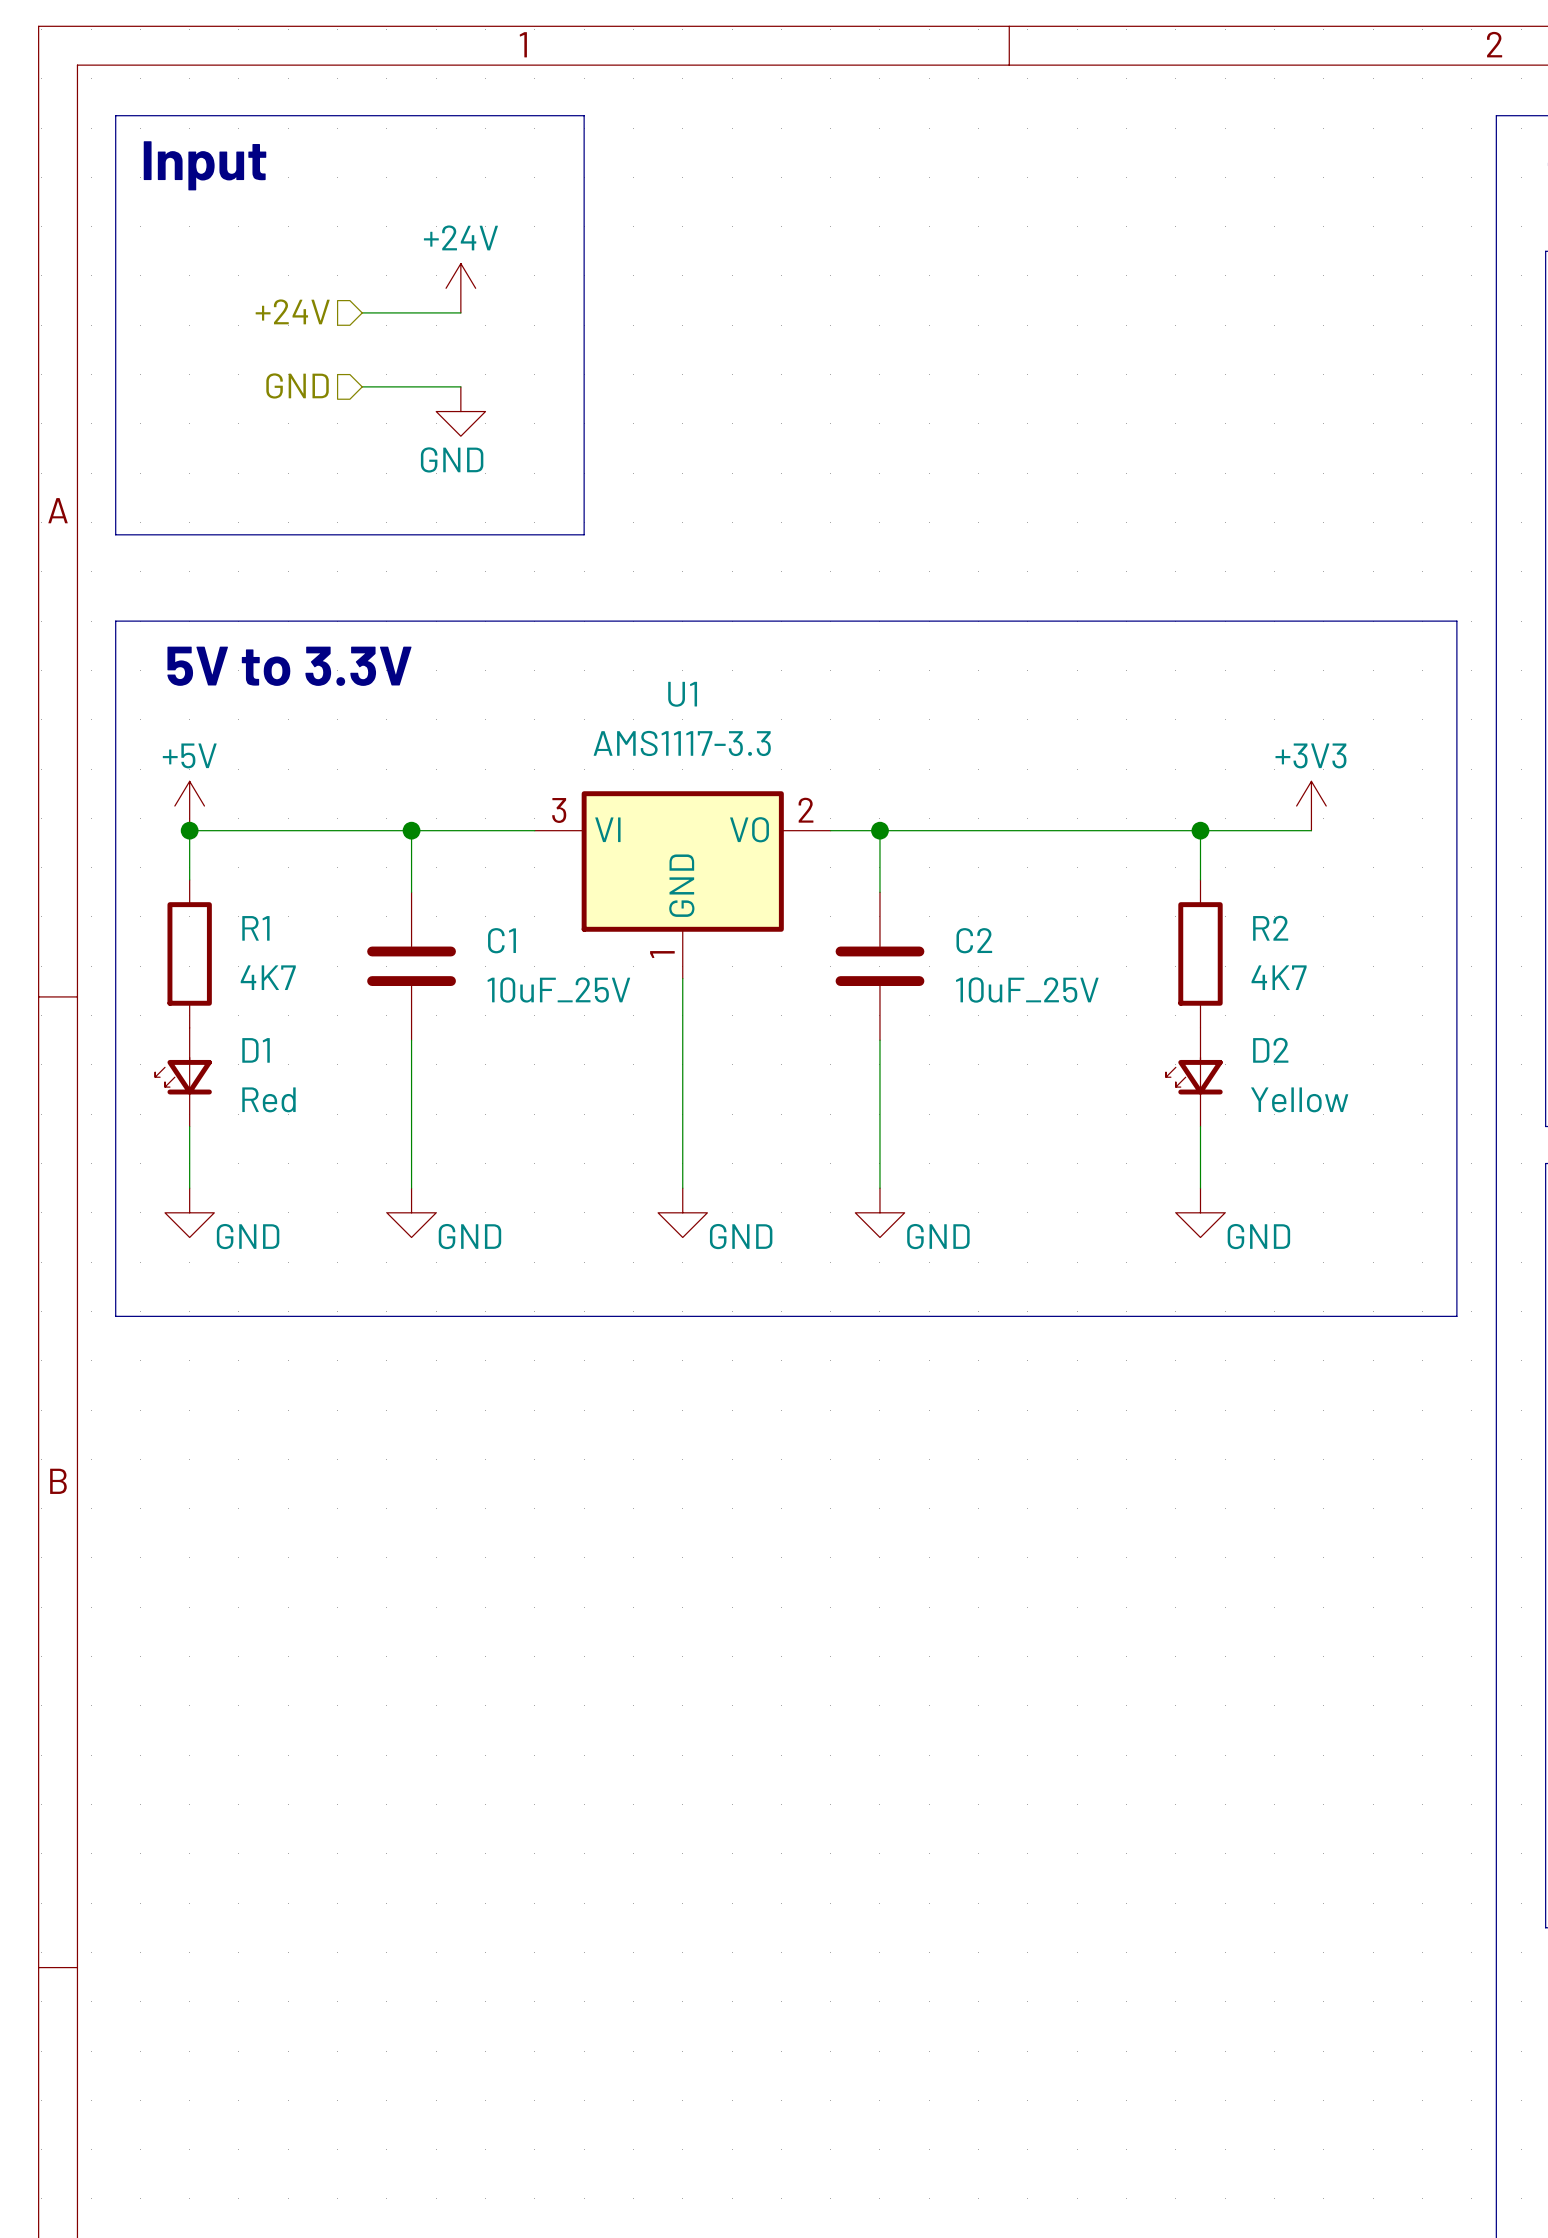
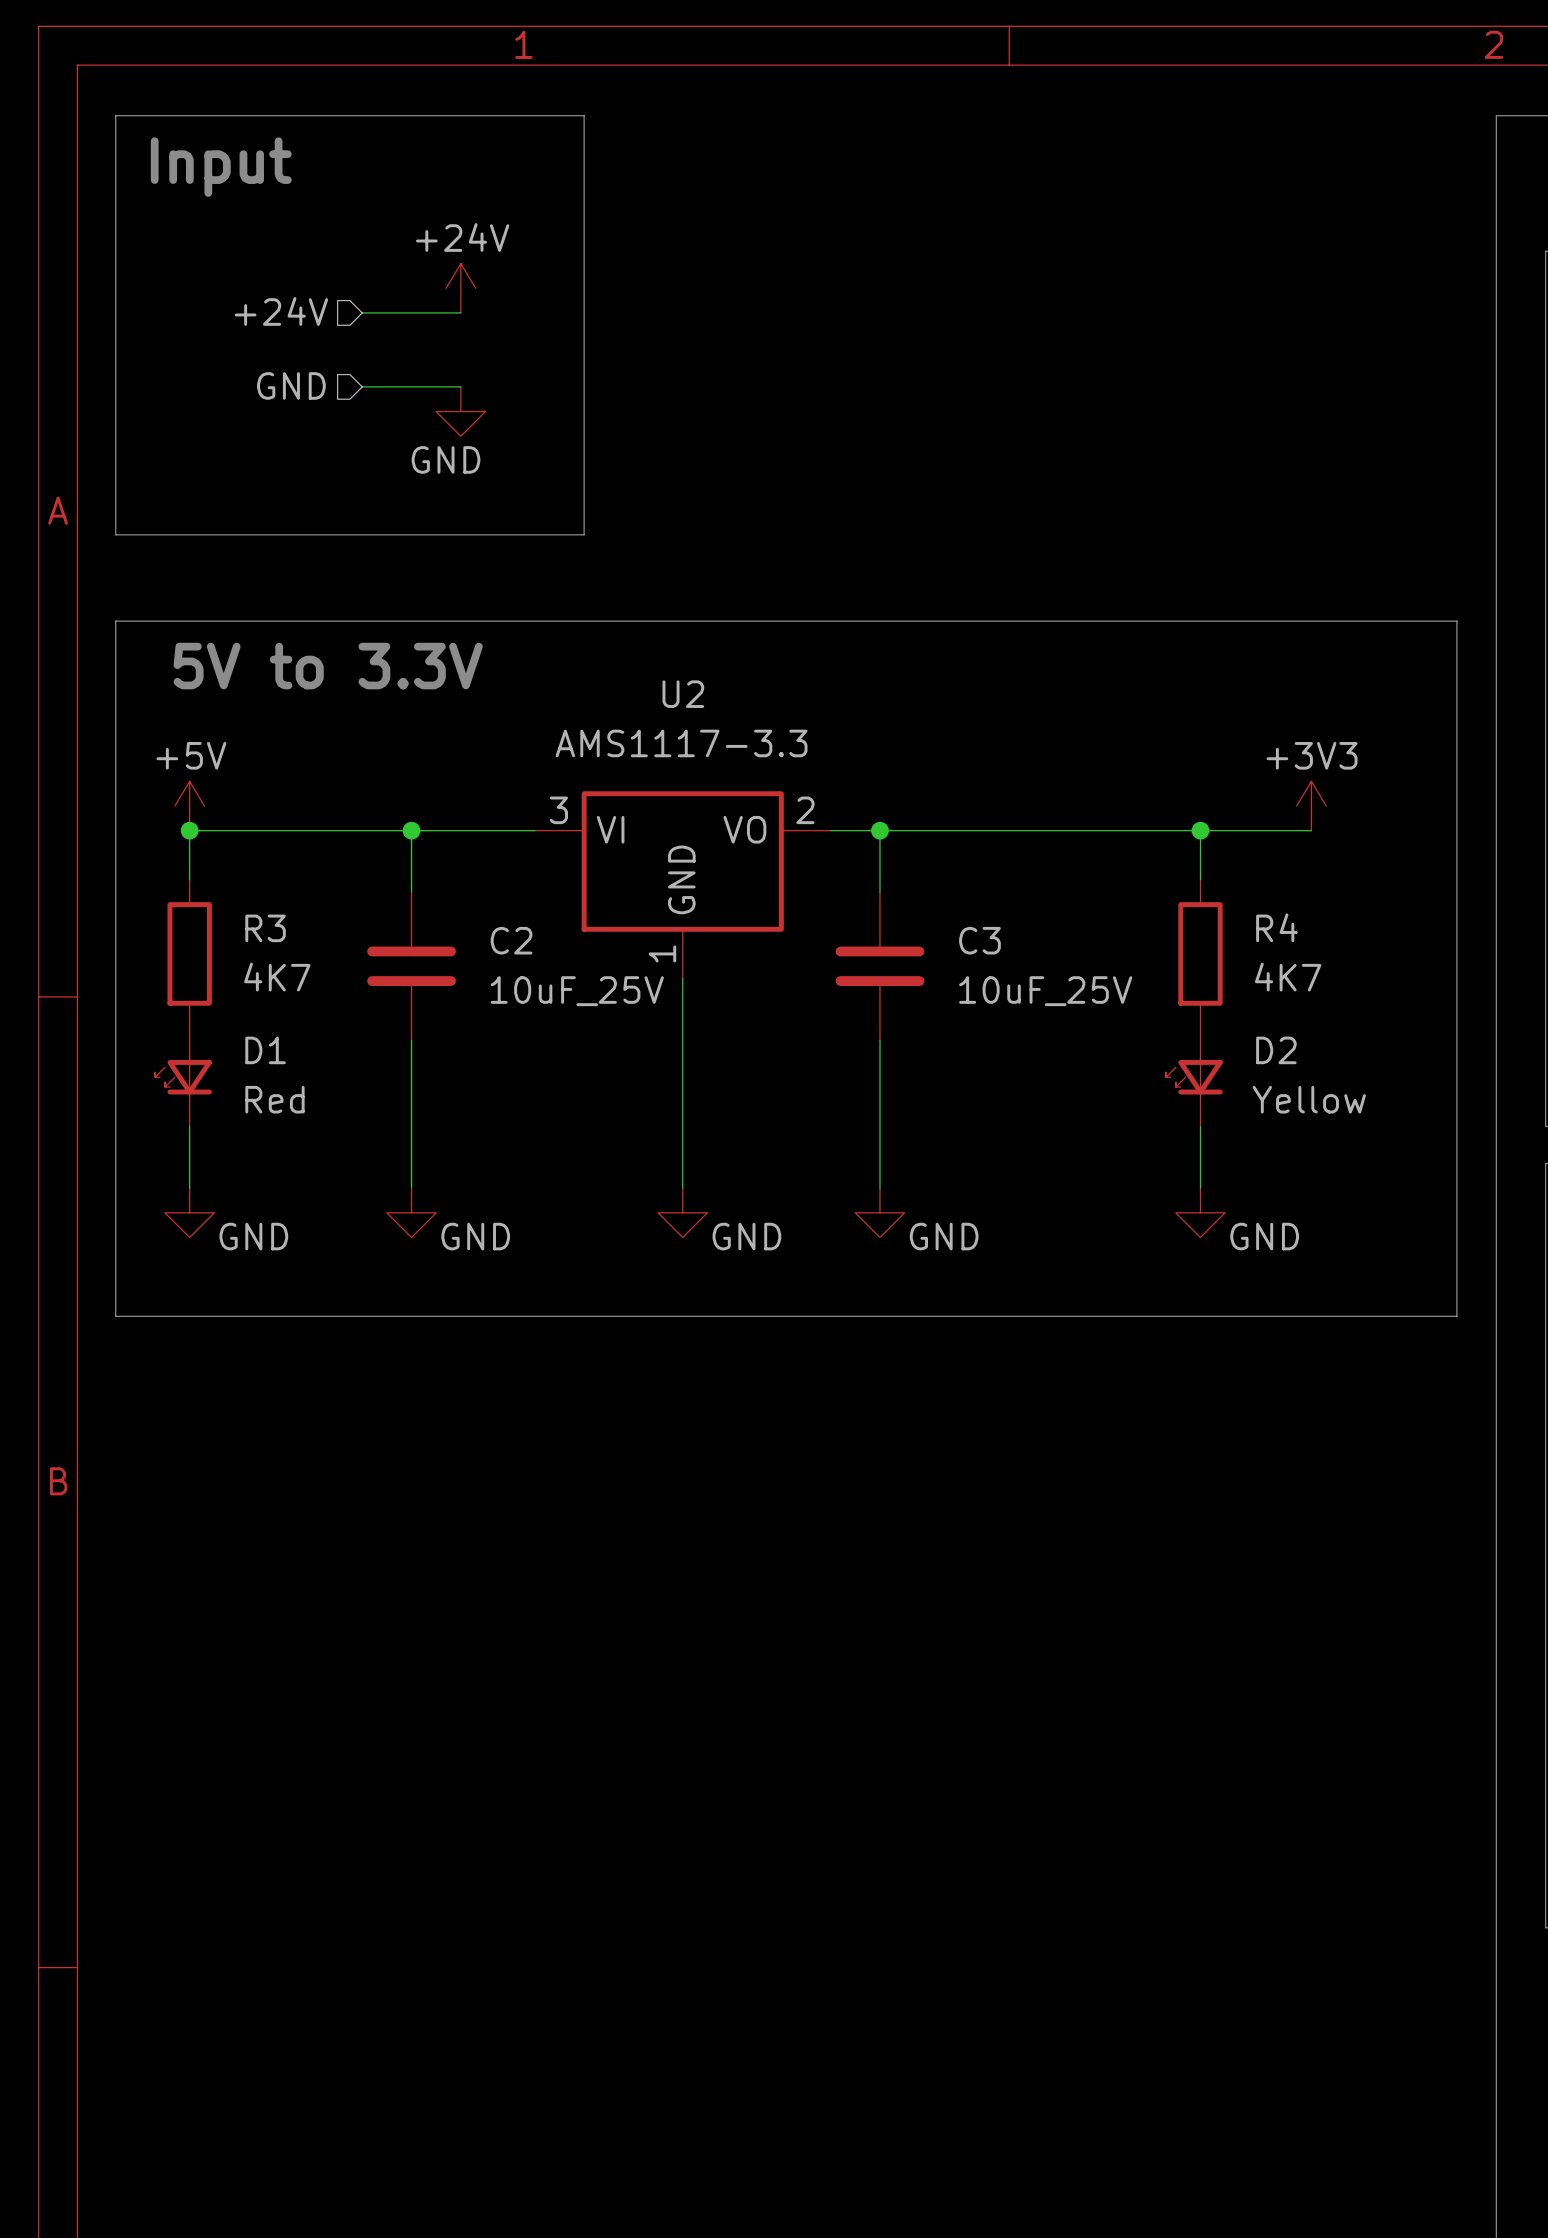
U1 name: U1 (682, 694) -> U2 (683, 694)
R1 name: R1 (255, 928) -> R3 (265, 928)
R2 name: R2 (1270, 928) -> R4 (1276, 927)
C1 name: C1 (502, 940) -> C2 (511, 940)
C2 name: C2 (974, 940) -> C3 (979, 940)

